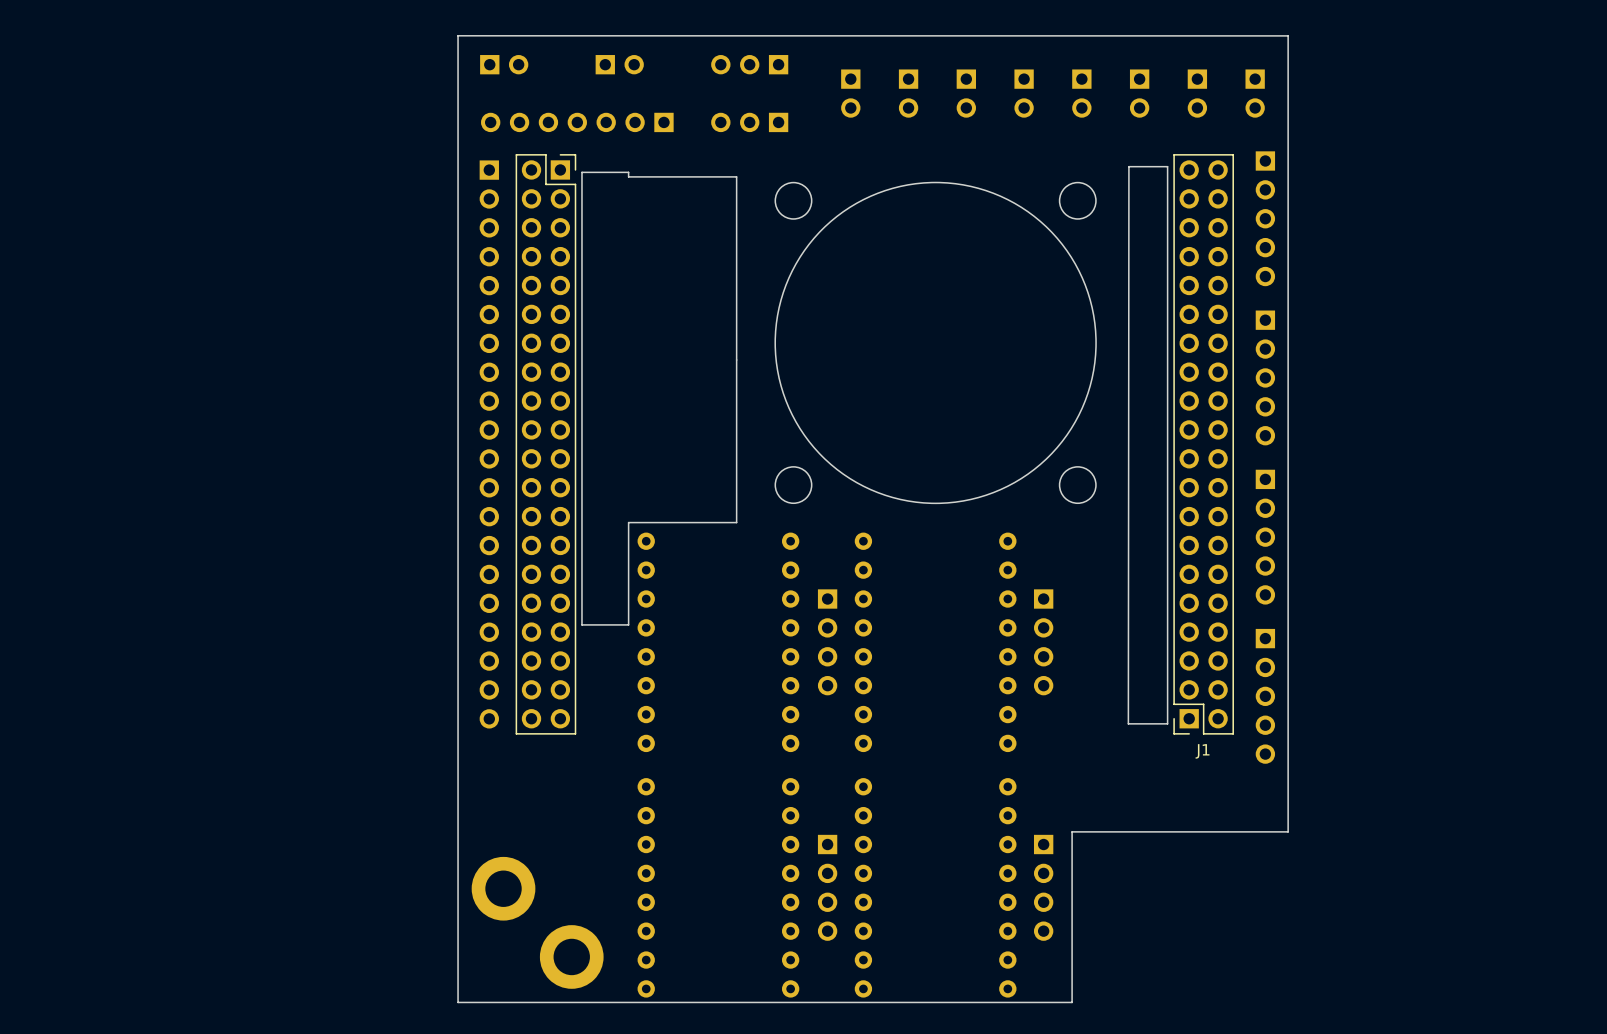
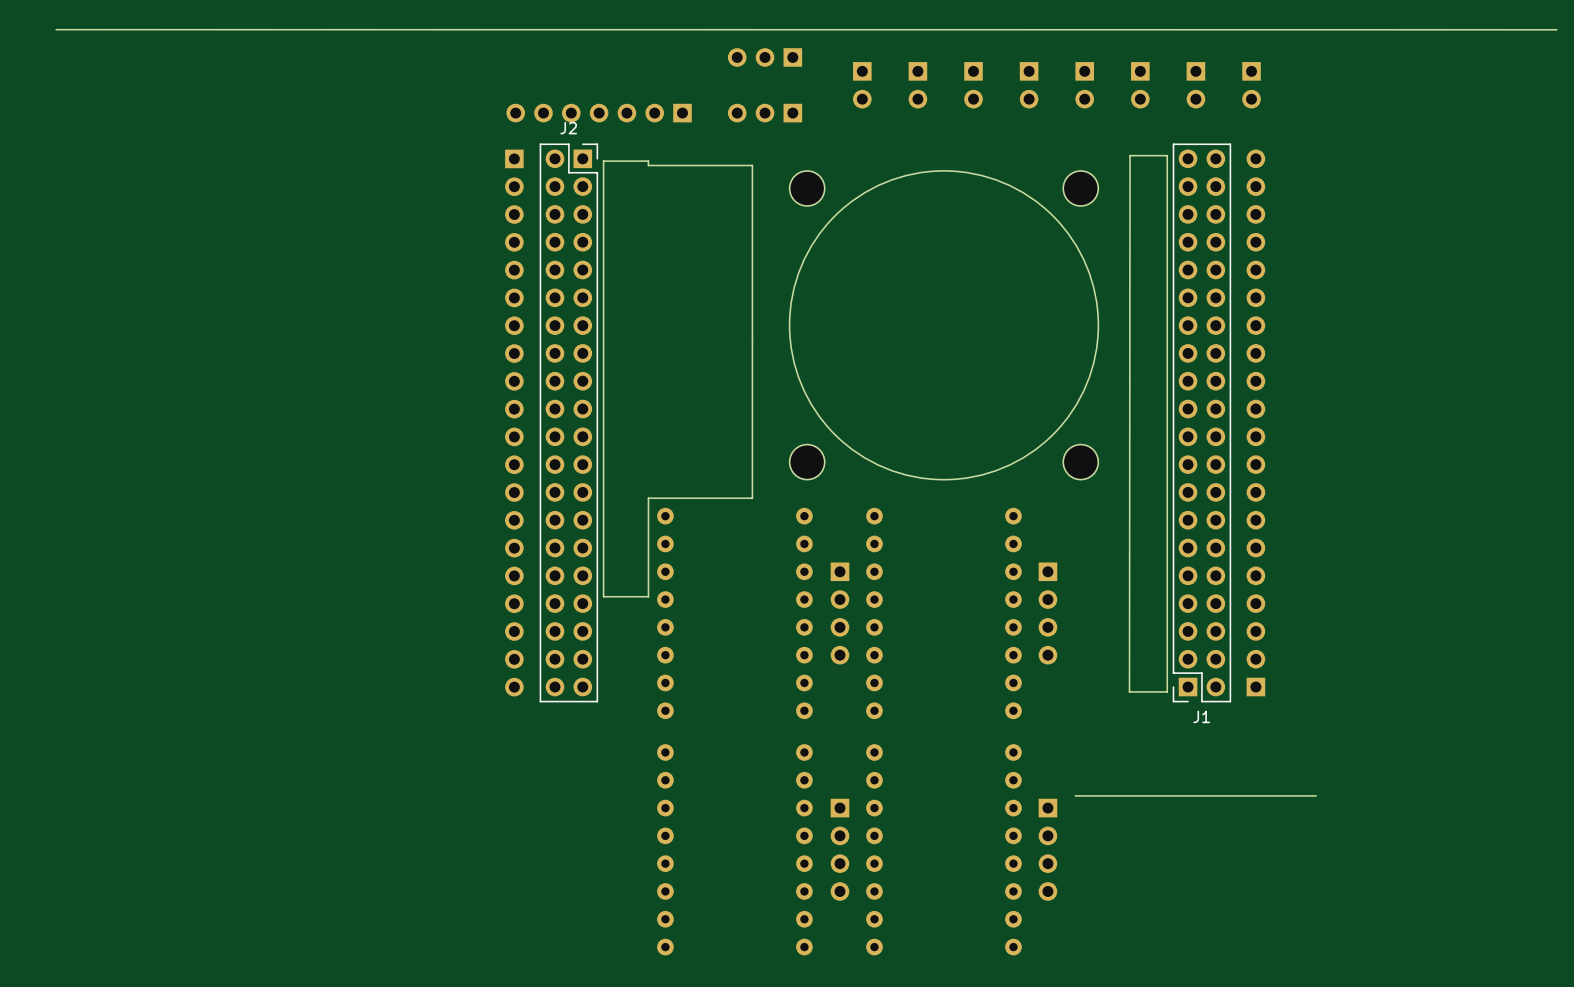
board edge: none -> (56, 29) (1556, 29)
part: (504, 64) -> none
part: (619, 64) -> none
J2 name: none -> J2 (568, 128)
part: (1265, 218) -> none
part: (1265, 377) -> none
part: none -> (1255, 422)
part: (1265, 537) -> none
part: (1265, 696) -> none
board edge: (1288, 831) (1288, 35) (458, 35) (458, 1002) (1072, 1002) (1072, 831) -> (1283, 795) (1316, 795)
part: (503, 888) -> none
part: (571, 956) -> none

